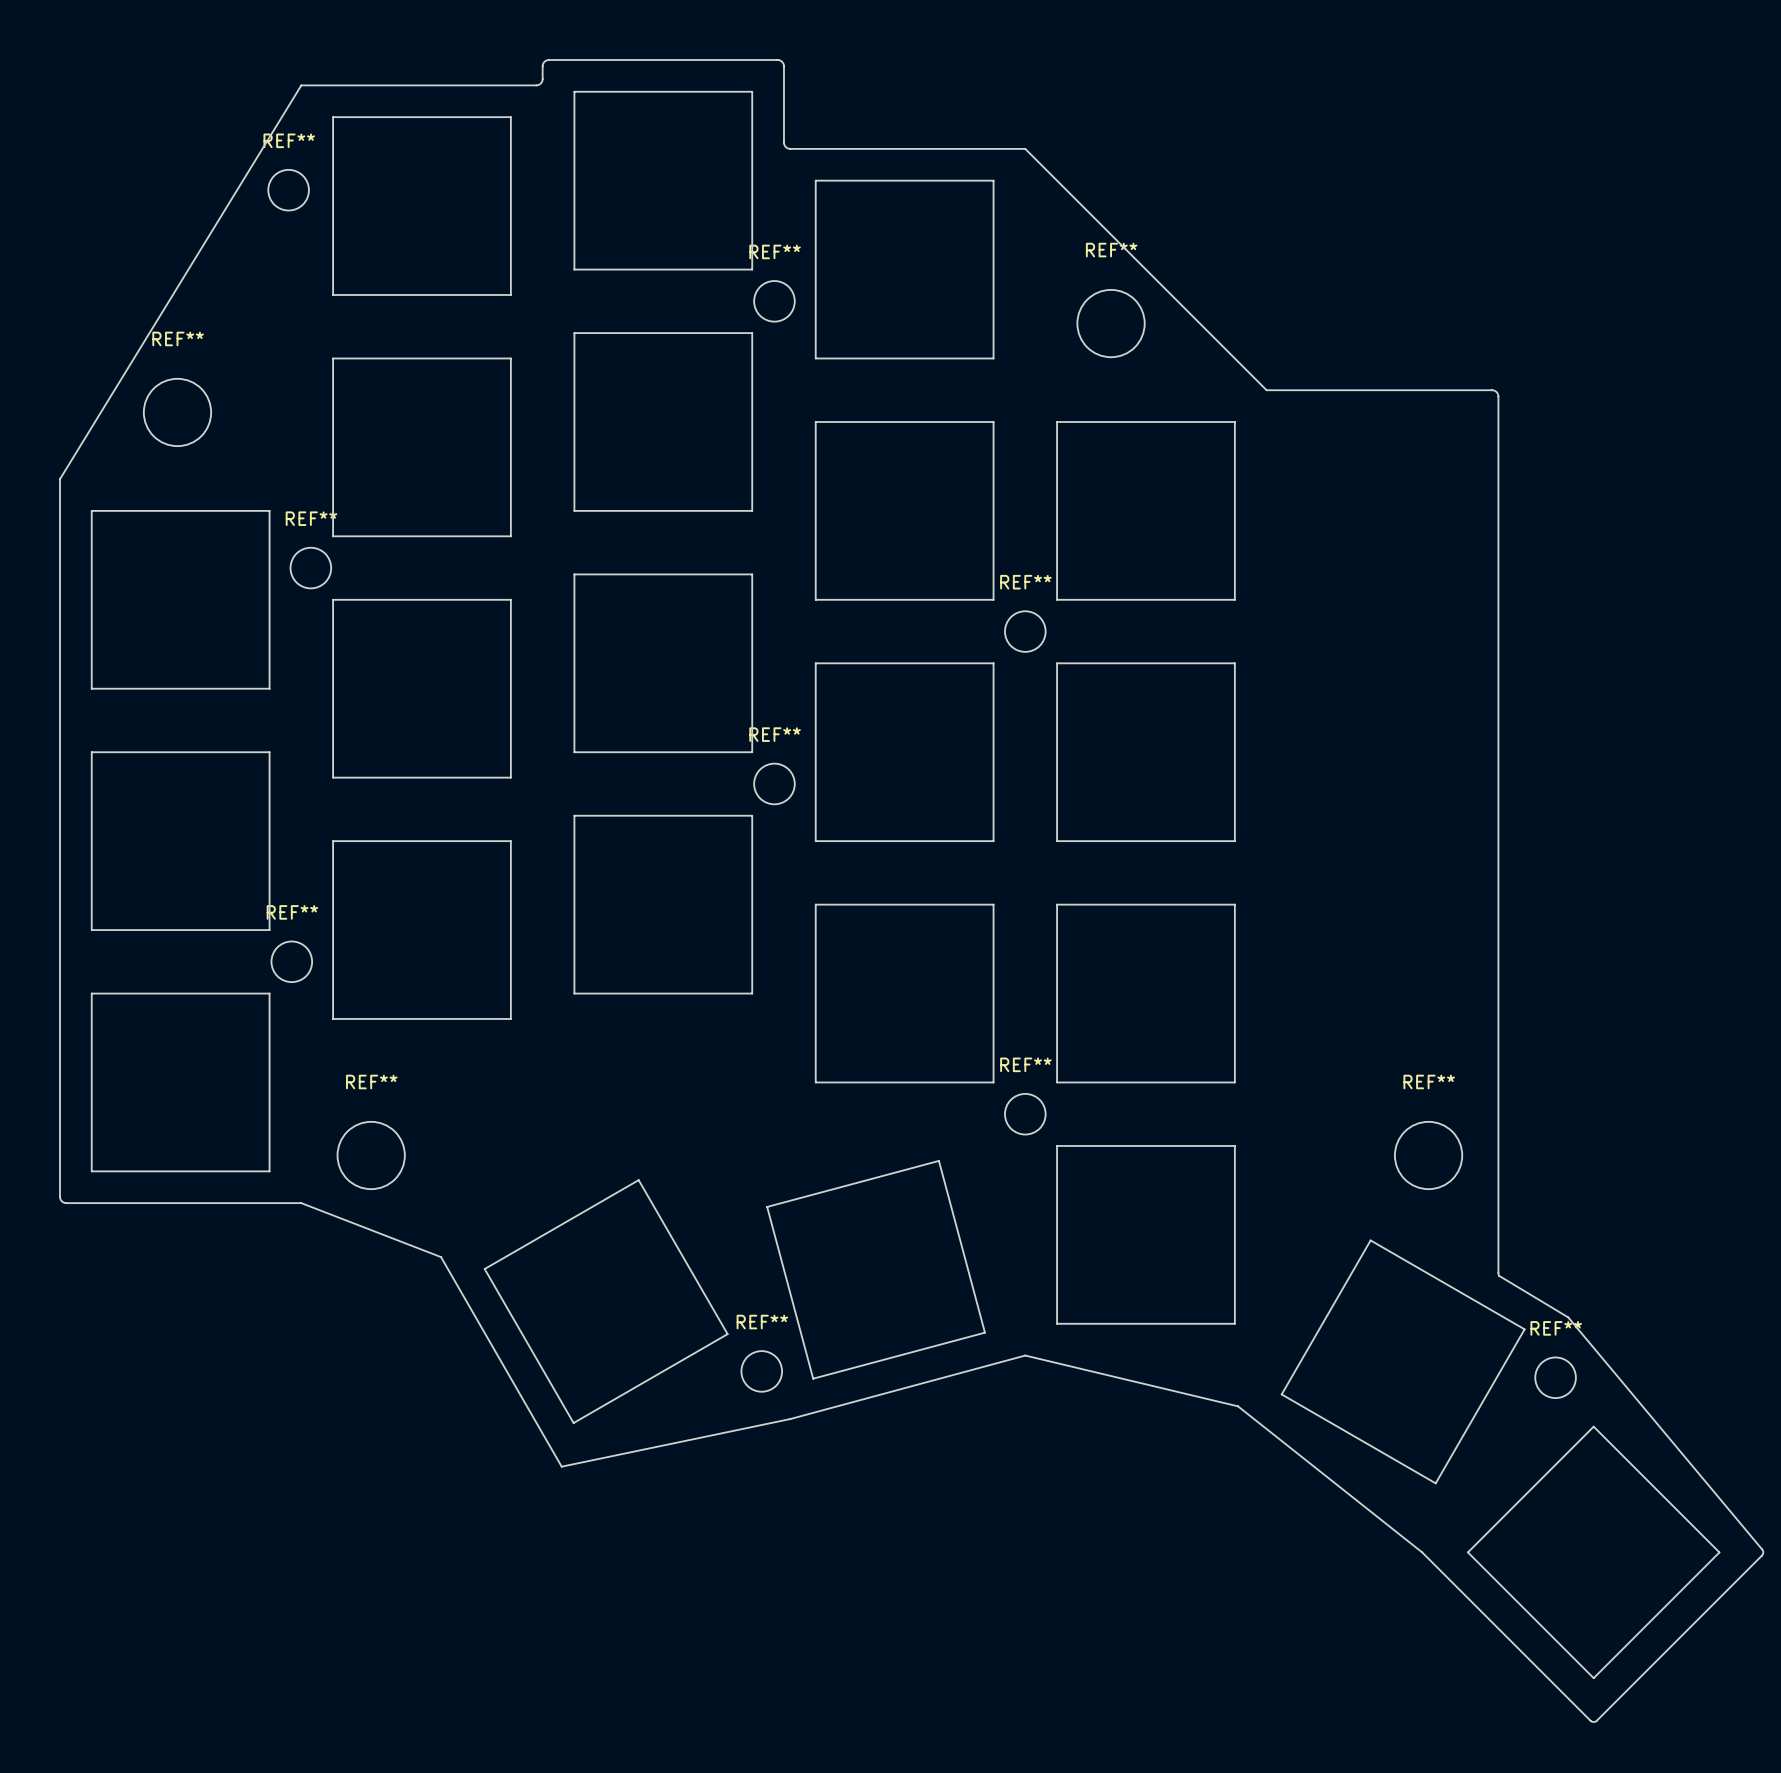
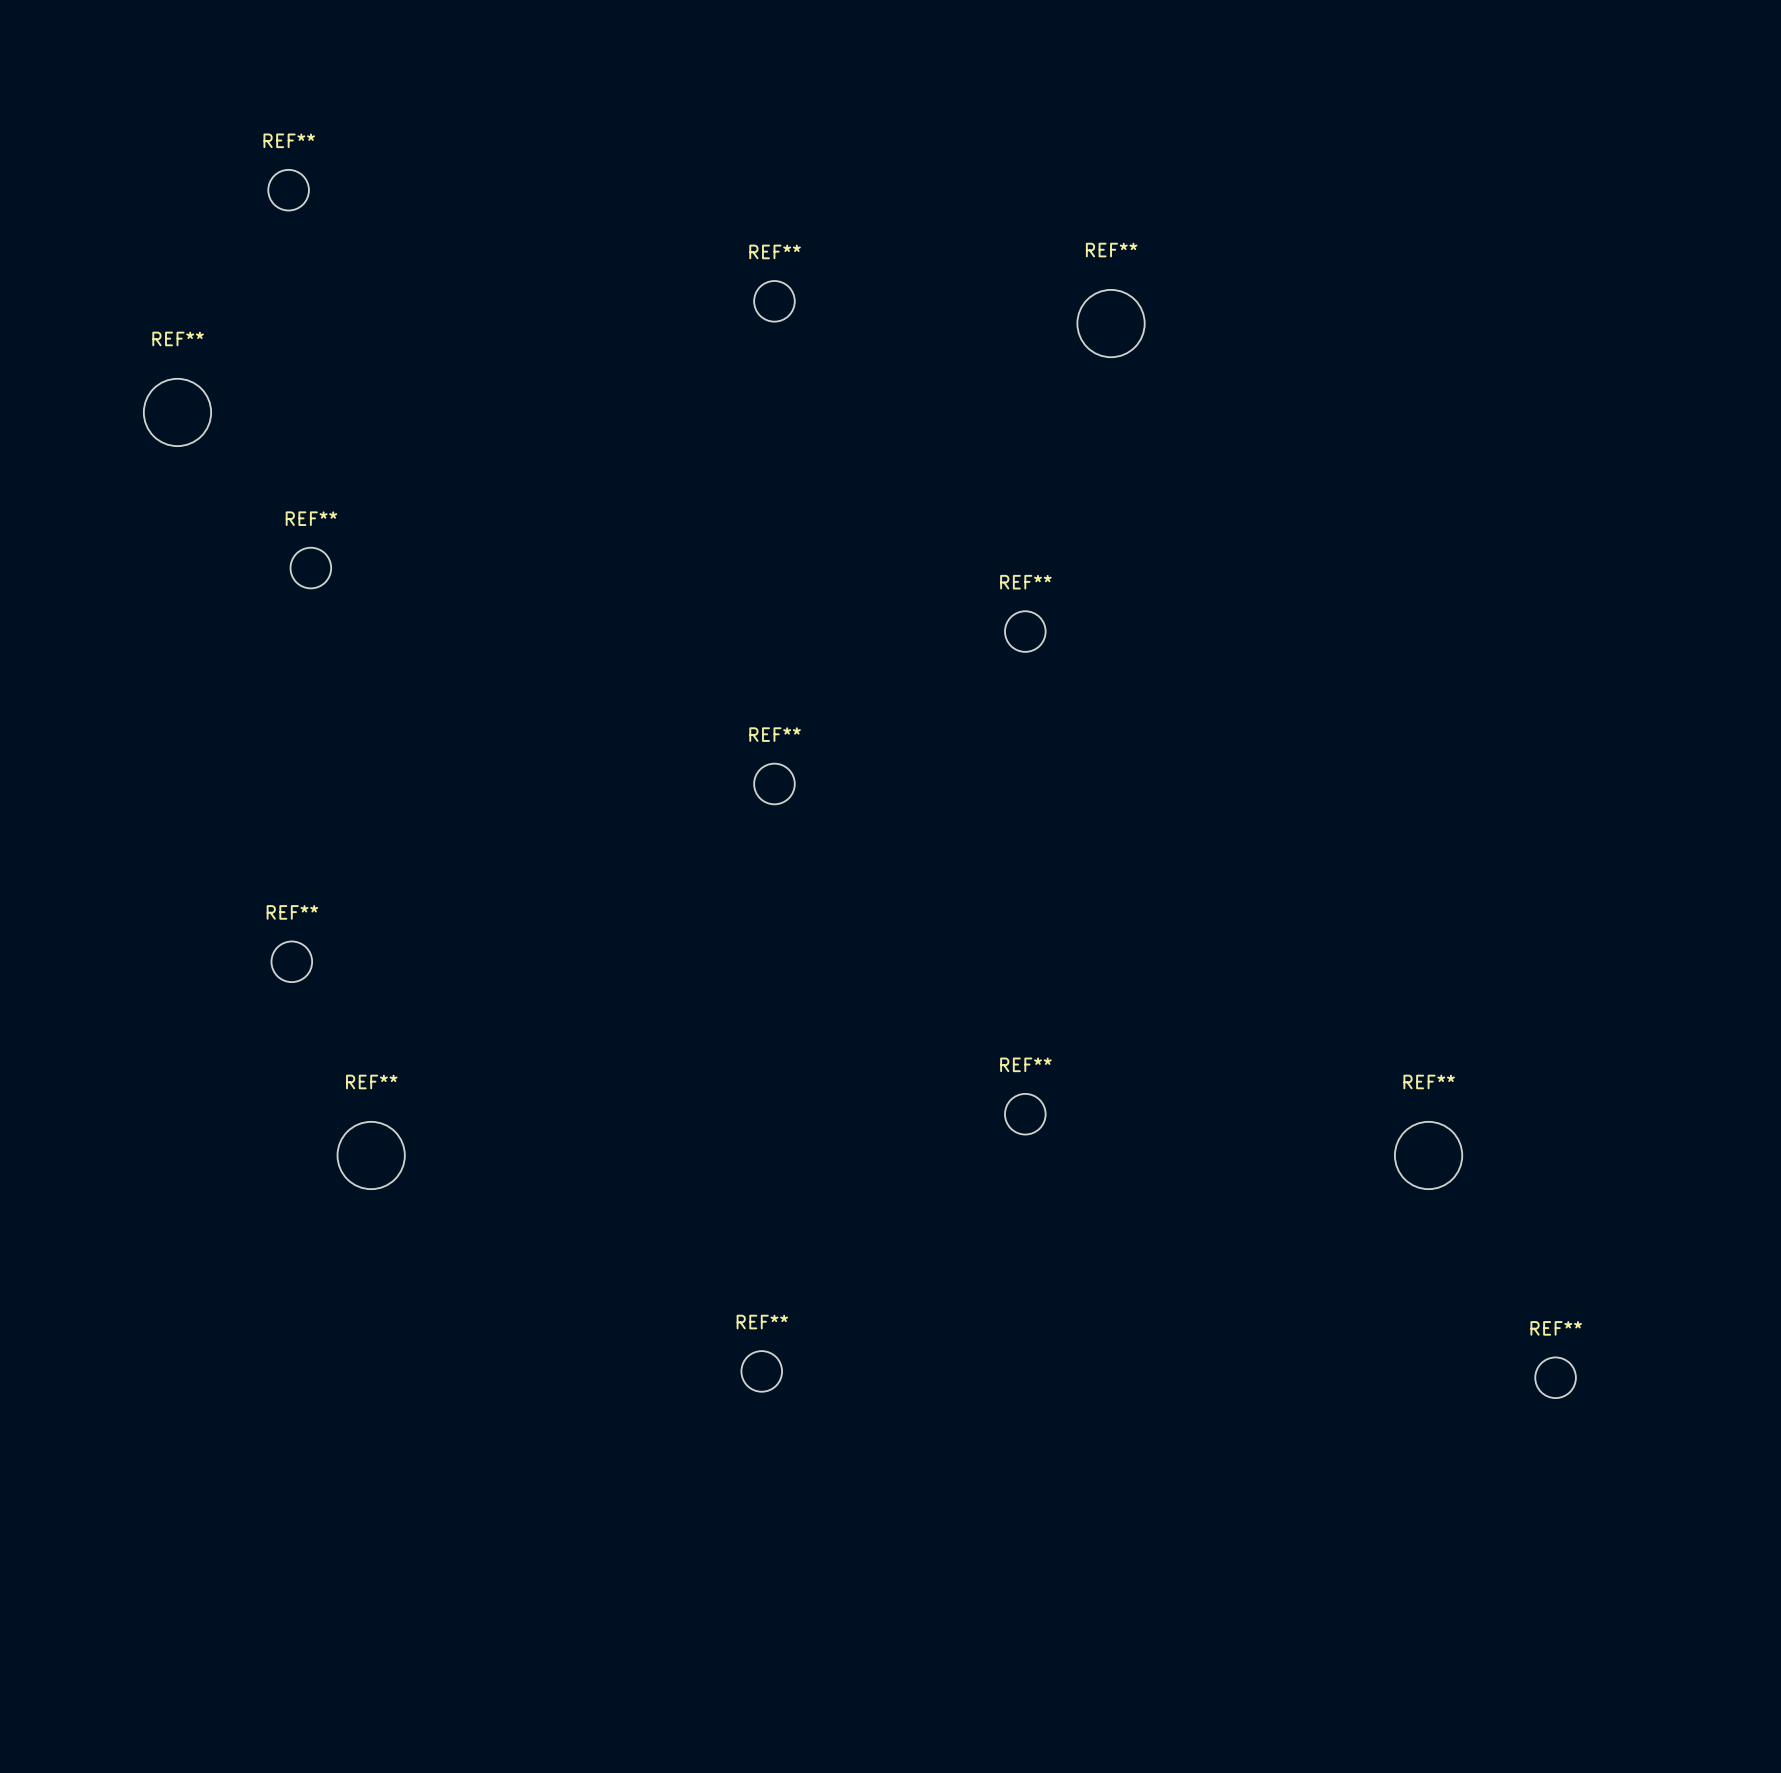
board edge: (549, 60) (780, 60) (783, 65) (783, 142) (786, 147) (1025, 148) (1266, 390) (1492, 390) (1497, 393) (1498, 1274) (1568, 1317) (1763, 1551) (1761, 1555) (1595, 1721) (1590, 1720) (1422, 1552) (1238, 1406) (1025, 1355) (790, 1419) (561, 1466) (441, 1257) (301, 1203) (66, 1203) (60, 1199) (60, 479) (301, 85) (537, 85) (542, 80) (543, 63) (549, 60) -> none
drawing: [573, 90, 753, 271] -> none
drawing: [332, 116, 512, 296] -> none
drawing: [814, 179, 995, 360] -> none
drawing: [573, 332, 753, 512] -> none
drawing: [332, 357, 512, 538] -> none
drawing: [814, 421, 995, 601] -> none
drawing: [1056, 421, 1236, 601] -> none
drawing: [90, 510, 271, 690] -> none
drawing: [573, 573, 753, 753] -> none
drawing: [332, 599, 512, 779] -> none
drawing: [814, 662, 995, 842] -> none
drawing: [1056, 662, 1236, 842] -> none
drawing: [90, 751, 271, 931] -> none
drawing: [573, 814, 753, 995] -> none
drawing: [332, 840, 512, 1020] -> none
drawing: [814, 903, 995, 1084] -> none
drawing: [1056, 903, 1236, 1084] -> none
drawing: [90, 992, 271, 1173] -> none
drawing: [1056, 1145, 1236, 1325] -> none
drawing: [766, 1160, 986, 1380] -> none
drawing: [483, 1179, 729, 1424] -> none
drawing: [1280, 1239, 1721, 1679] -> none

